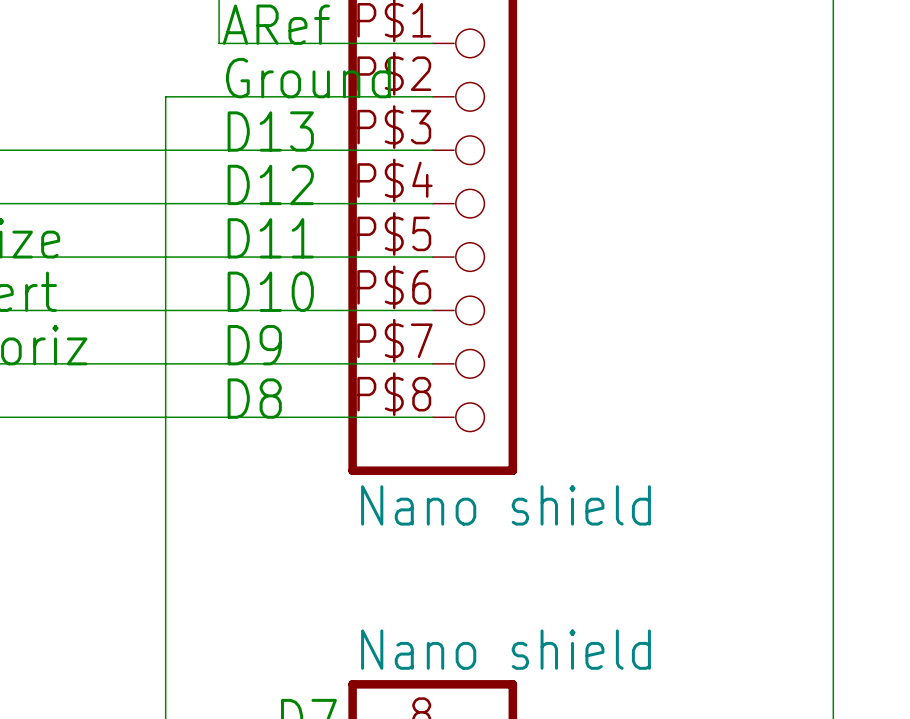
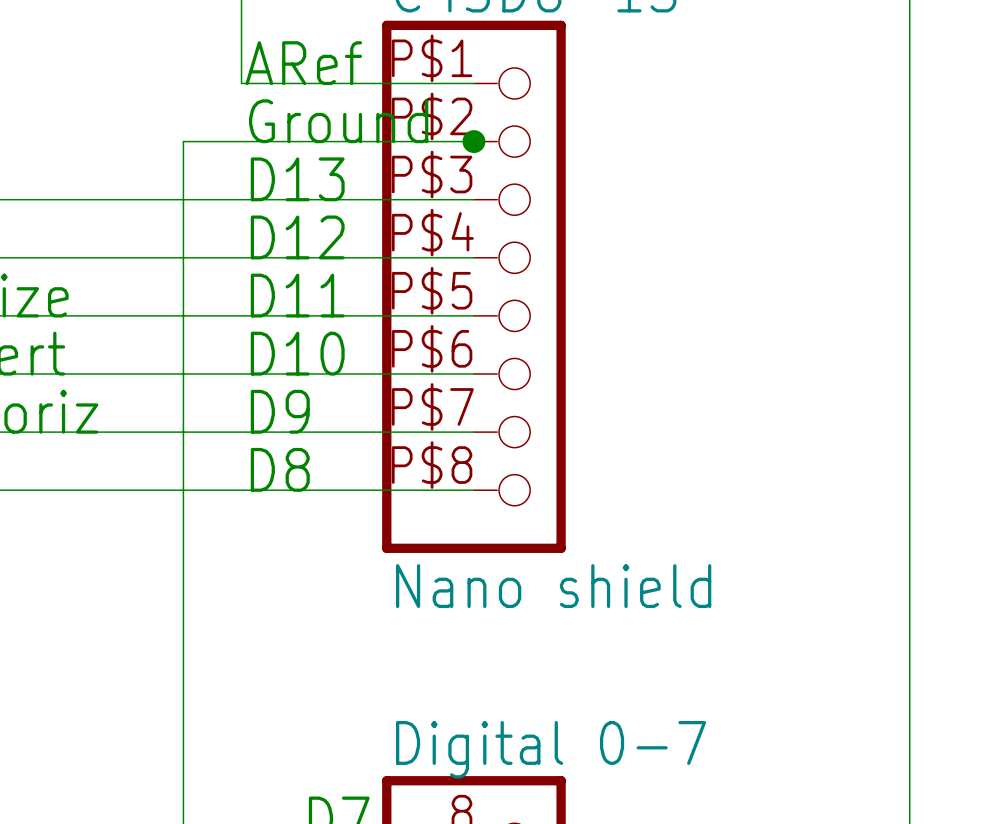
junction: none -> (473, 141)
part value: Nano shield (506, 649) -> Digital 0-7 (551, 749)

